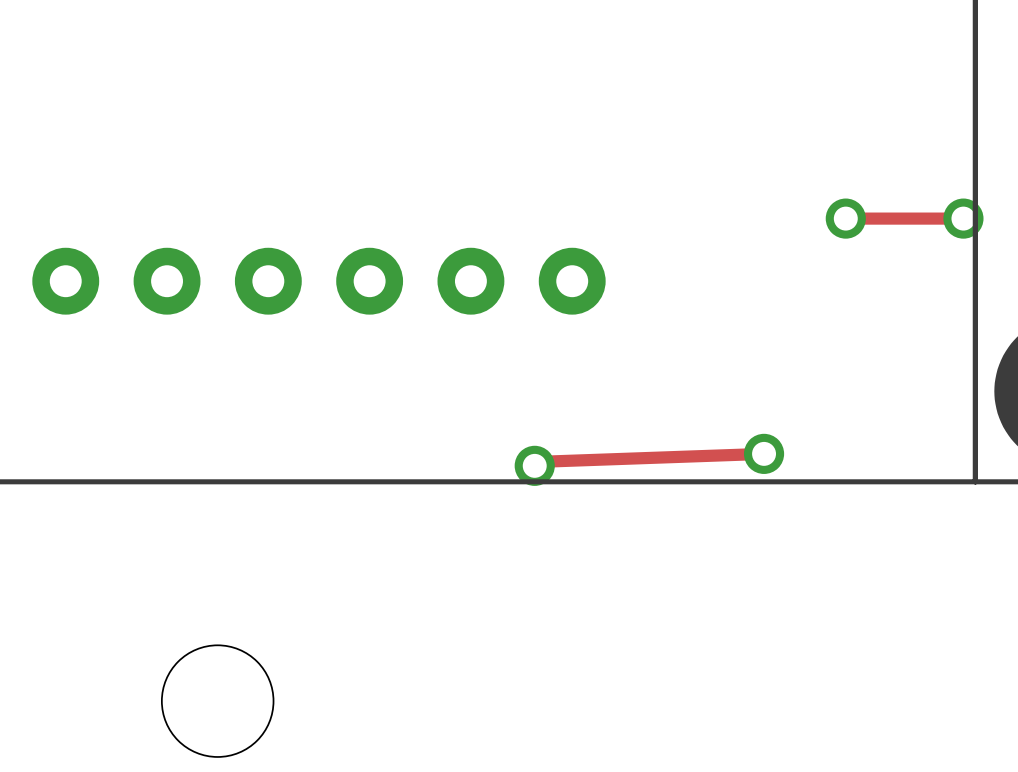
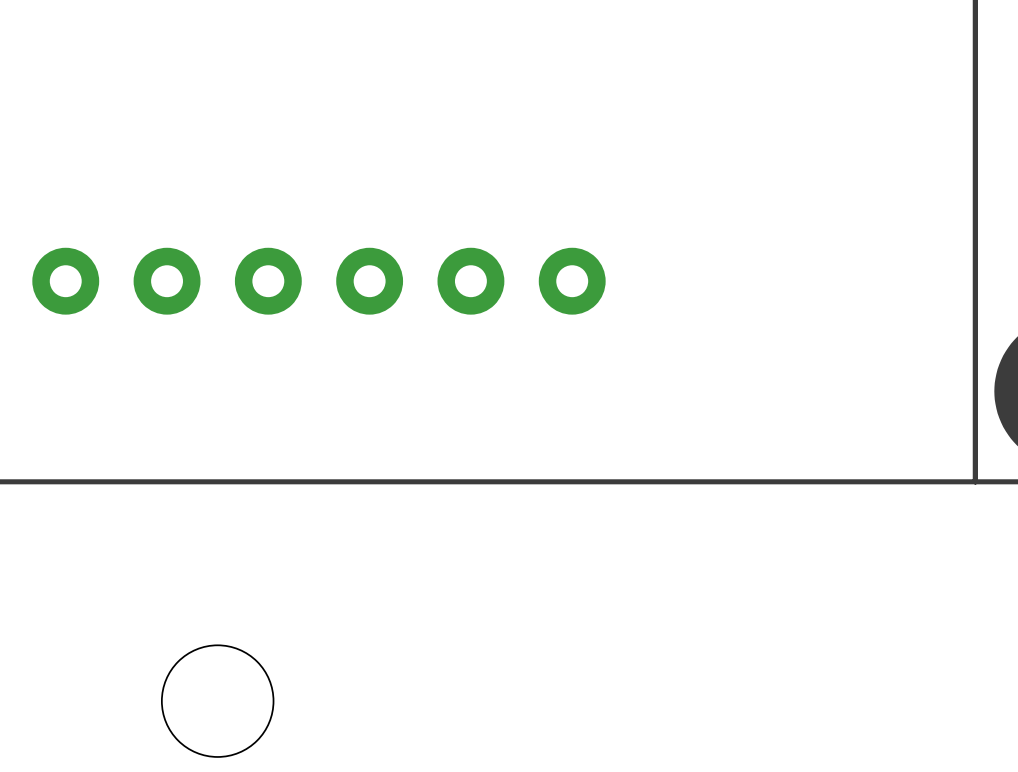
track: (845, 218) (963, 218) -> none
via: (845, 218) -> none
via: (963, 218) -> none
track: (764, 453) (538, 461) (534, 465) -> none
via: (764, 453) -> none
via: (534, 465) -> none

